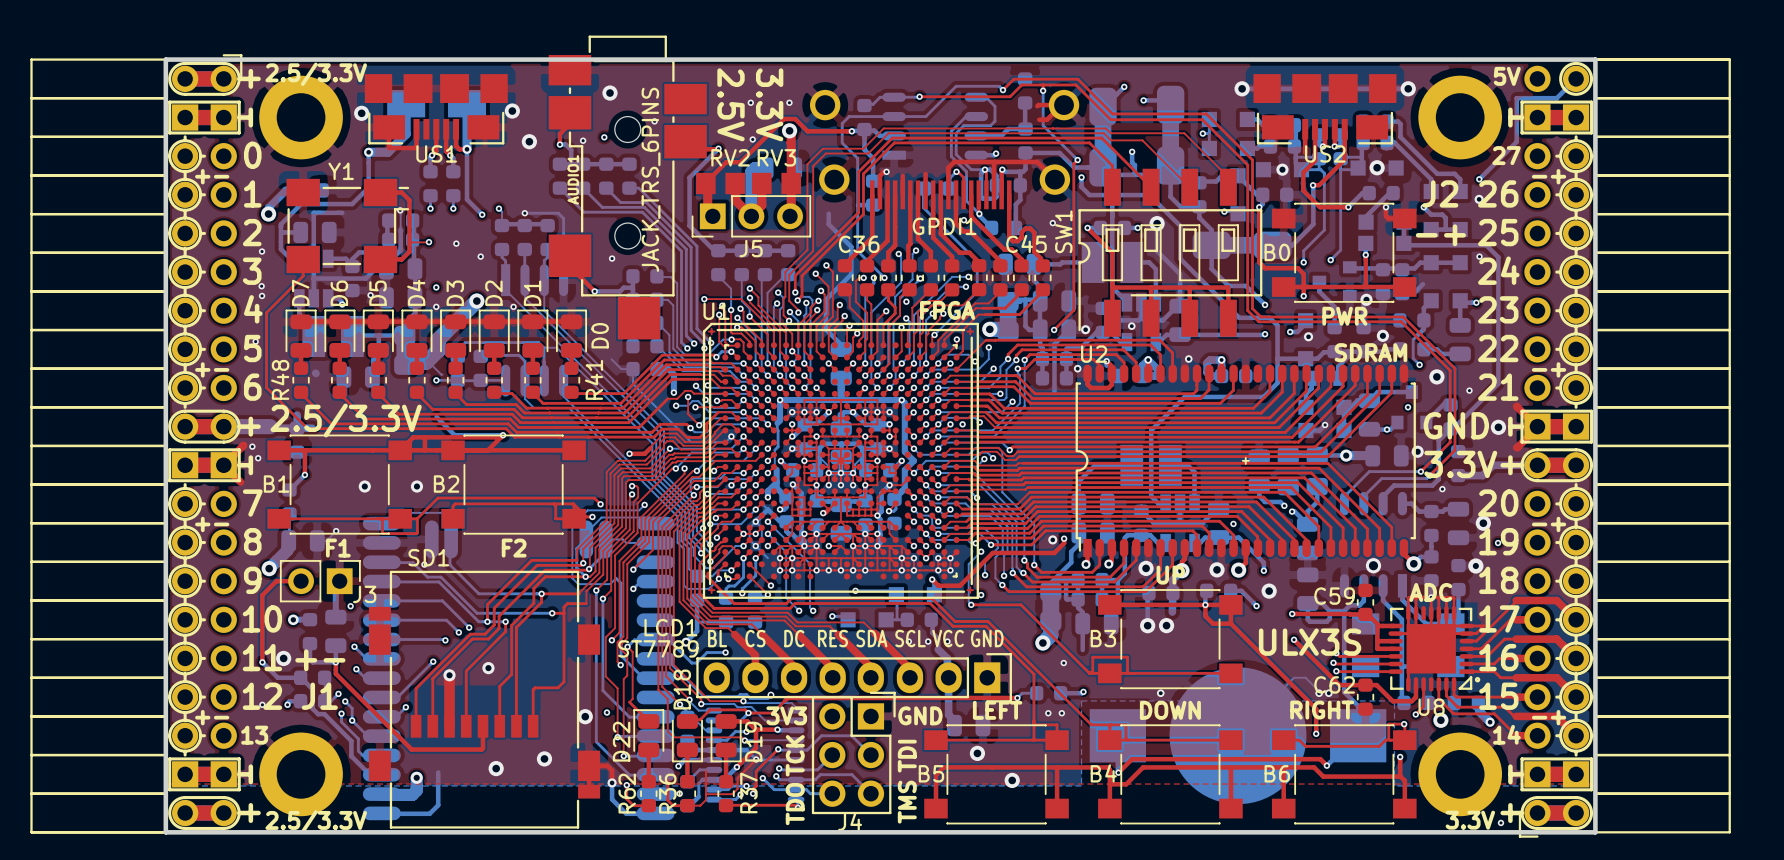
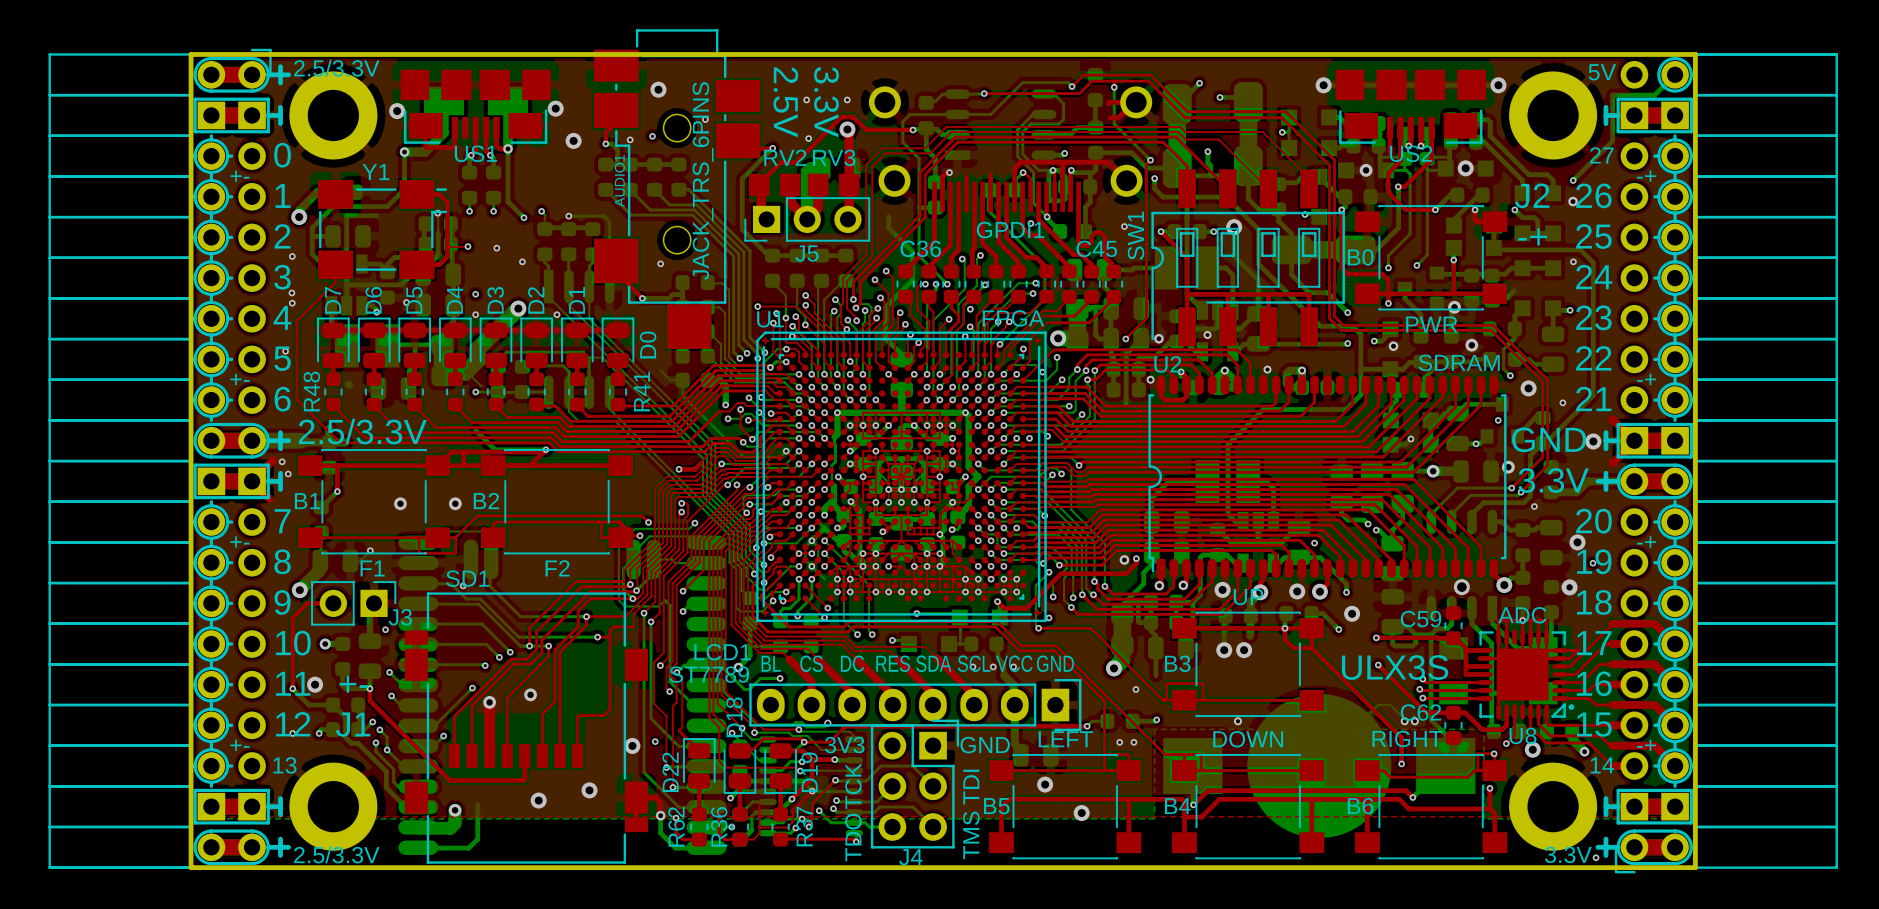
U2 footprint: [1075, 364, 1416, 558] -> [1148, 375, 1507, 579]

